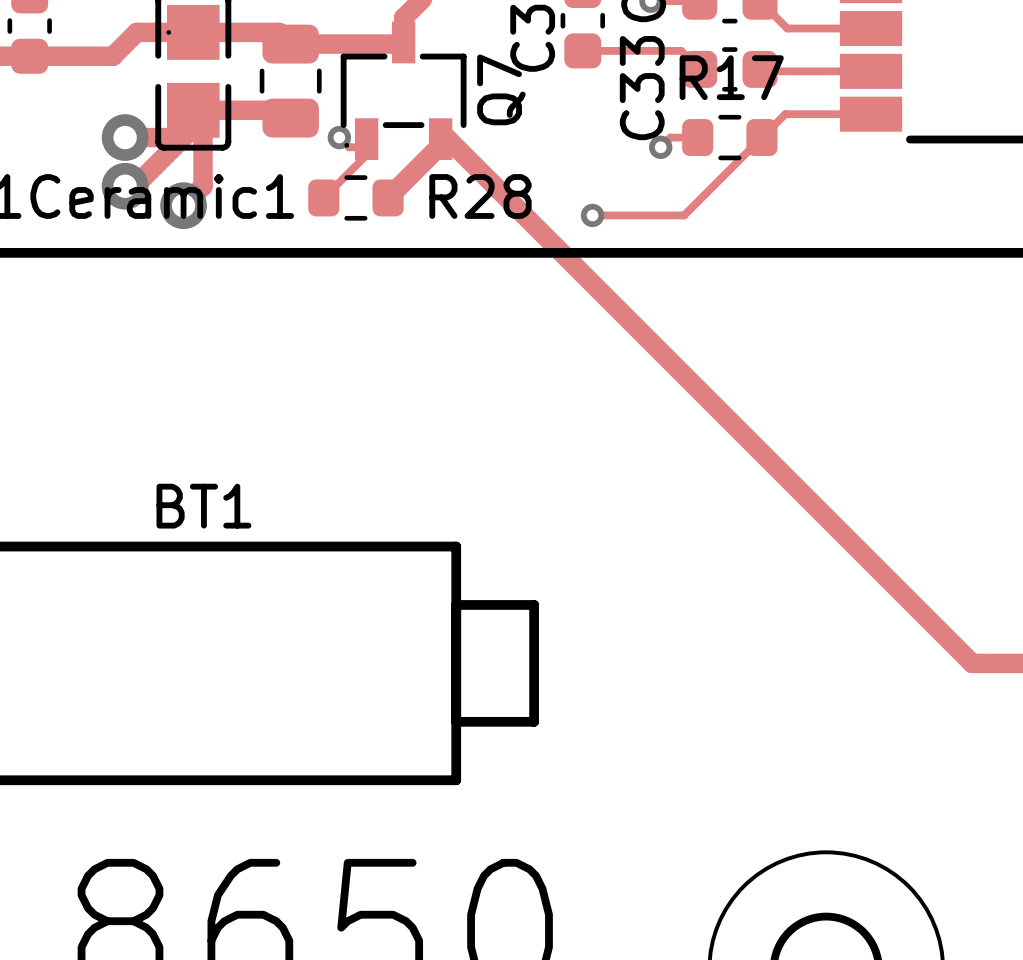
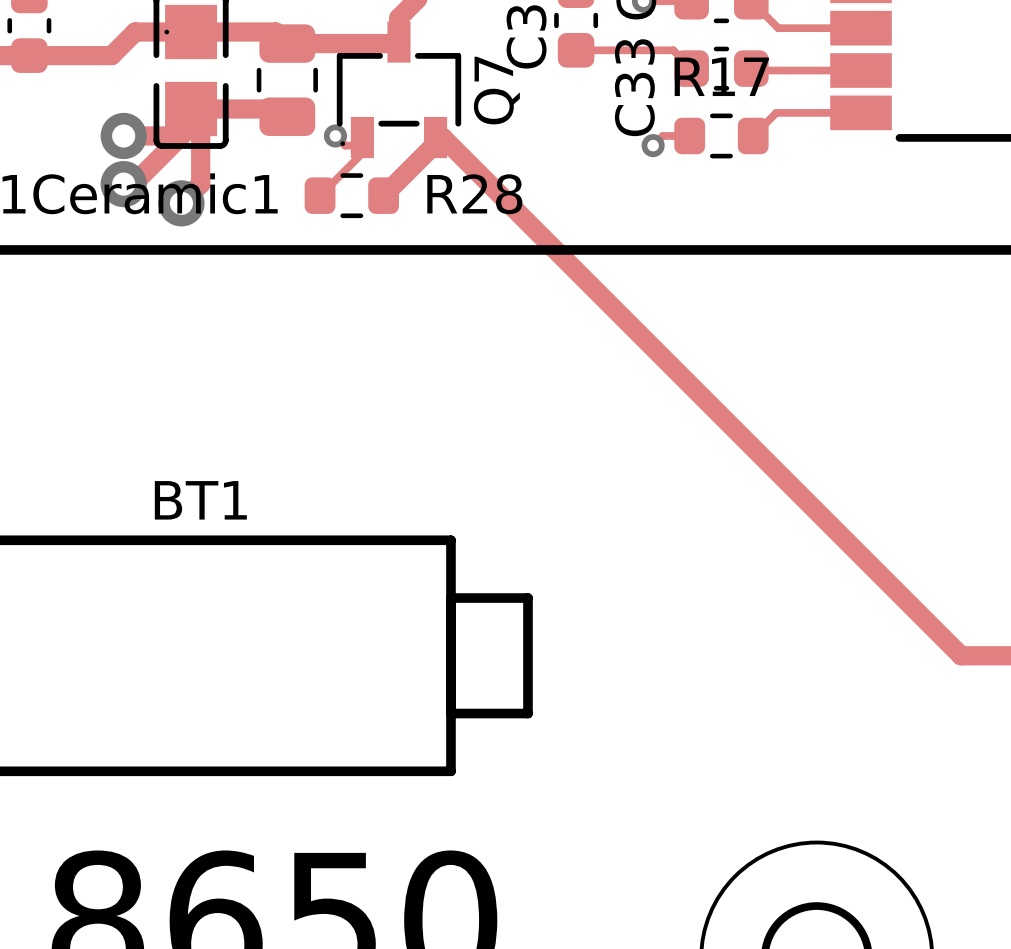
track: (761, 137) (684, 215) (592, 215) -> none
via: (592, 215) -> none

